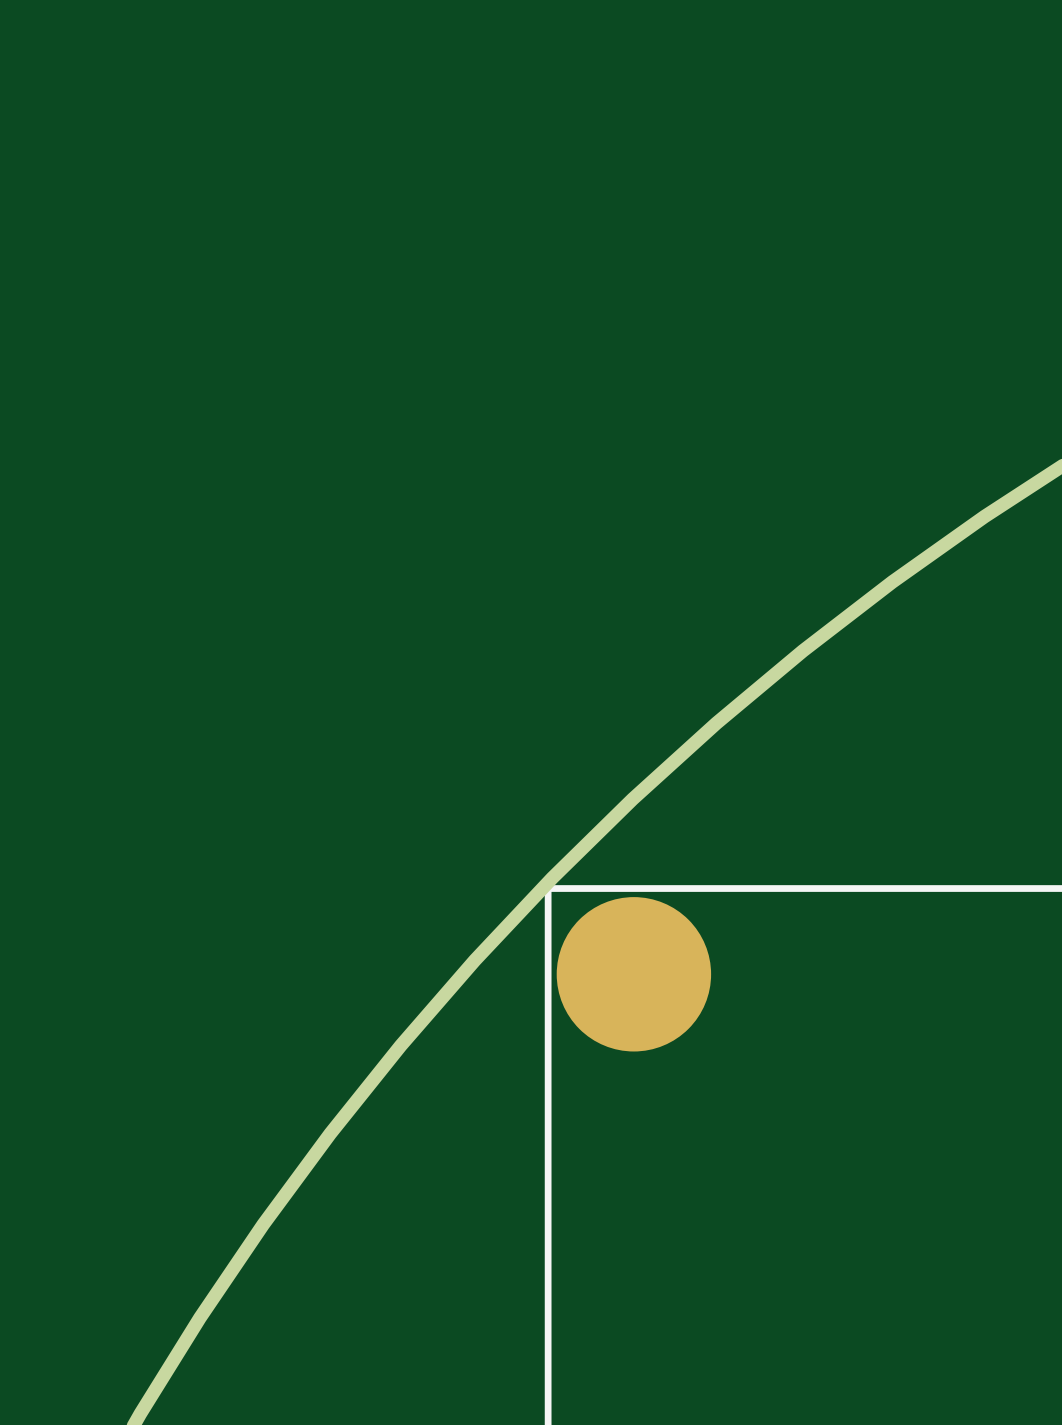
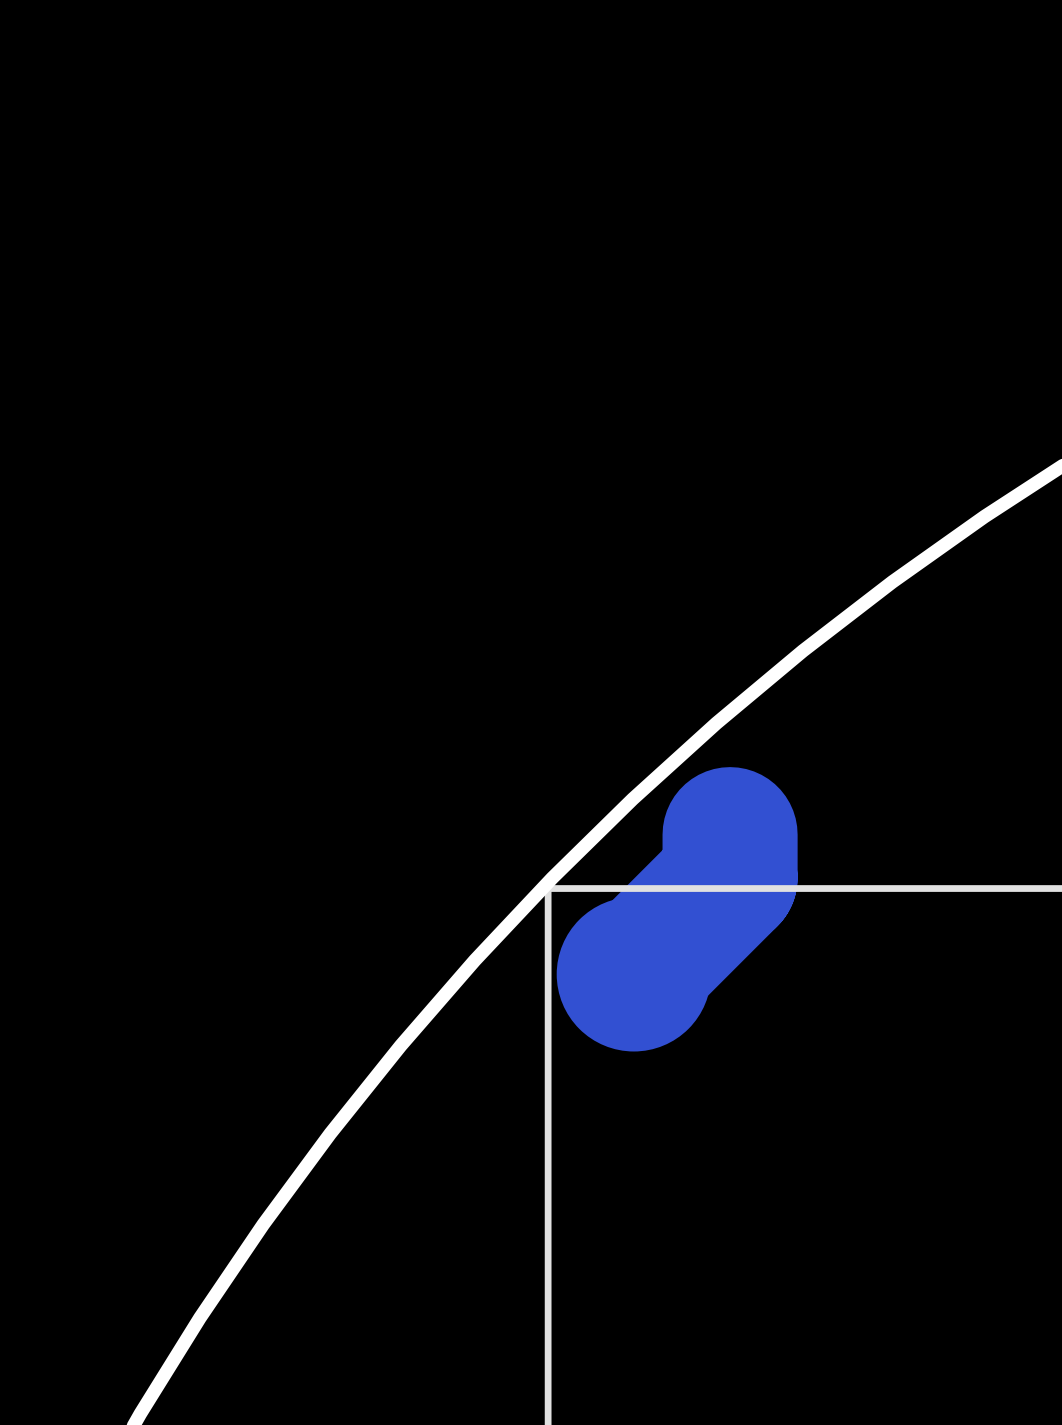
track: none -> (730, 834) (730, 878) (633, 974)

